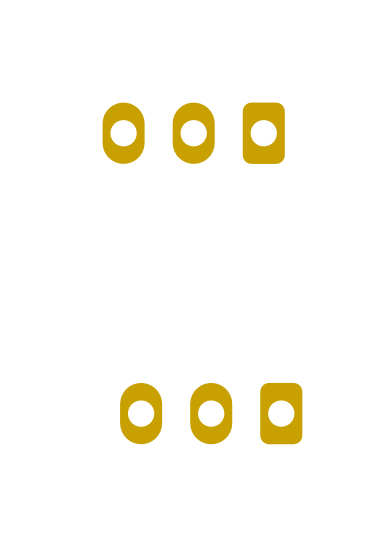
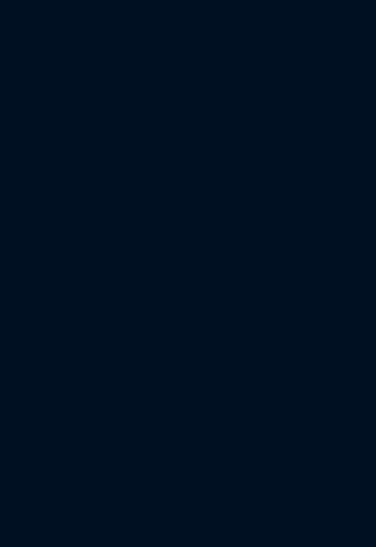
part: (193, 133) -> none
part: (211, 413) -> none

